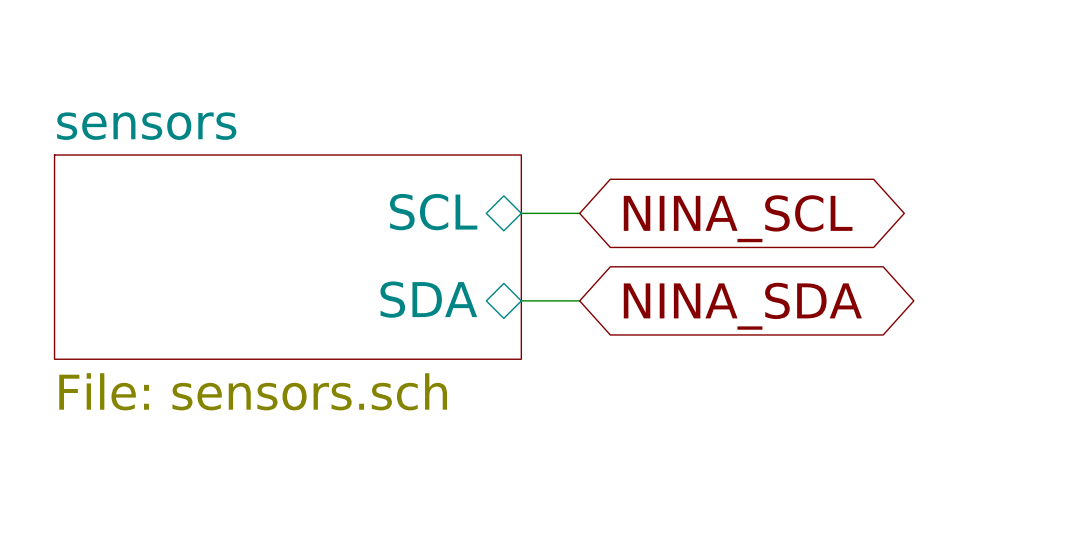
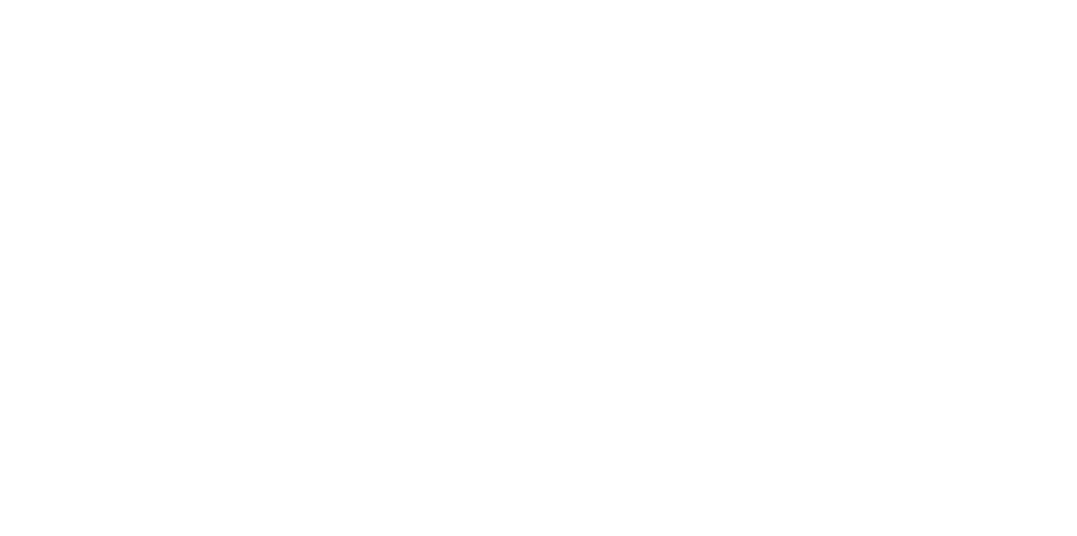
sheet pin: SCL (433, 212) -> none
wire: (521, 213) (579, 213) -> none
global label: NINA_SCL (738, 218) -> none
sheet sensors: File: sensors.sch (287, 257) -> none
sheet pin: SDA (428, 299) -> none
wire: (521, 300) (579, 300) -> none
global label: NINA_SDA (742, 306) -> none

